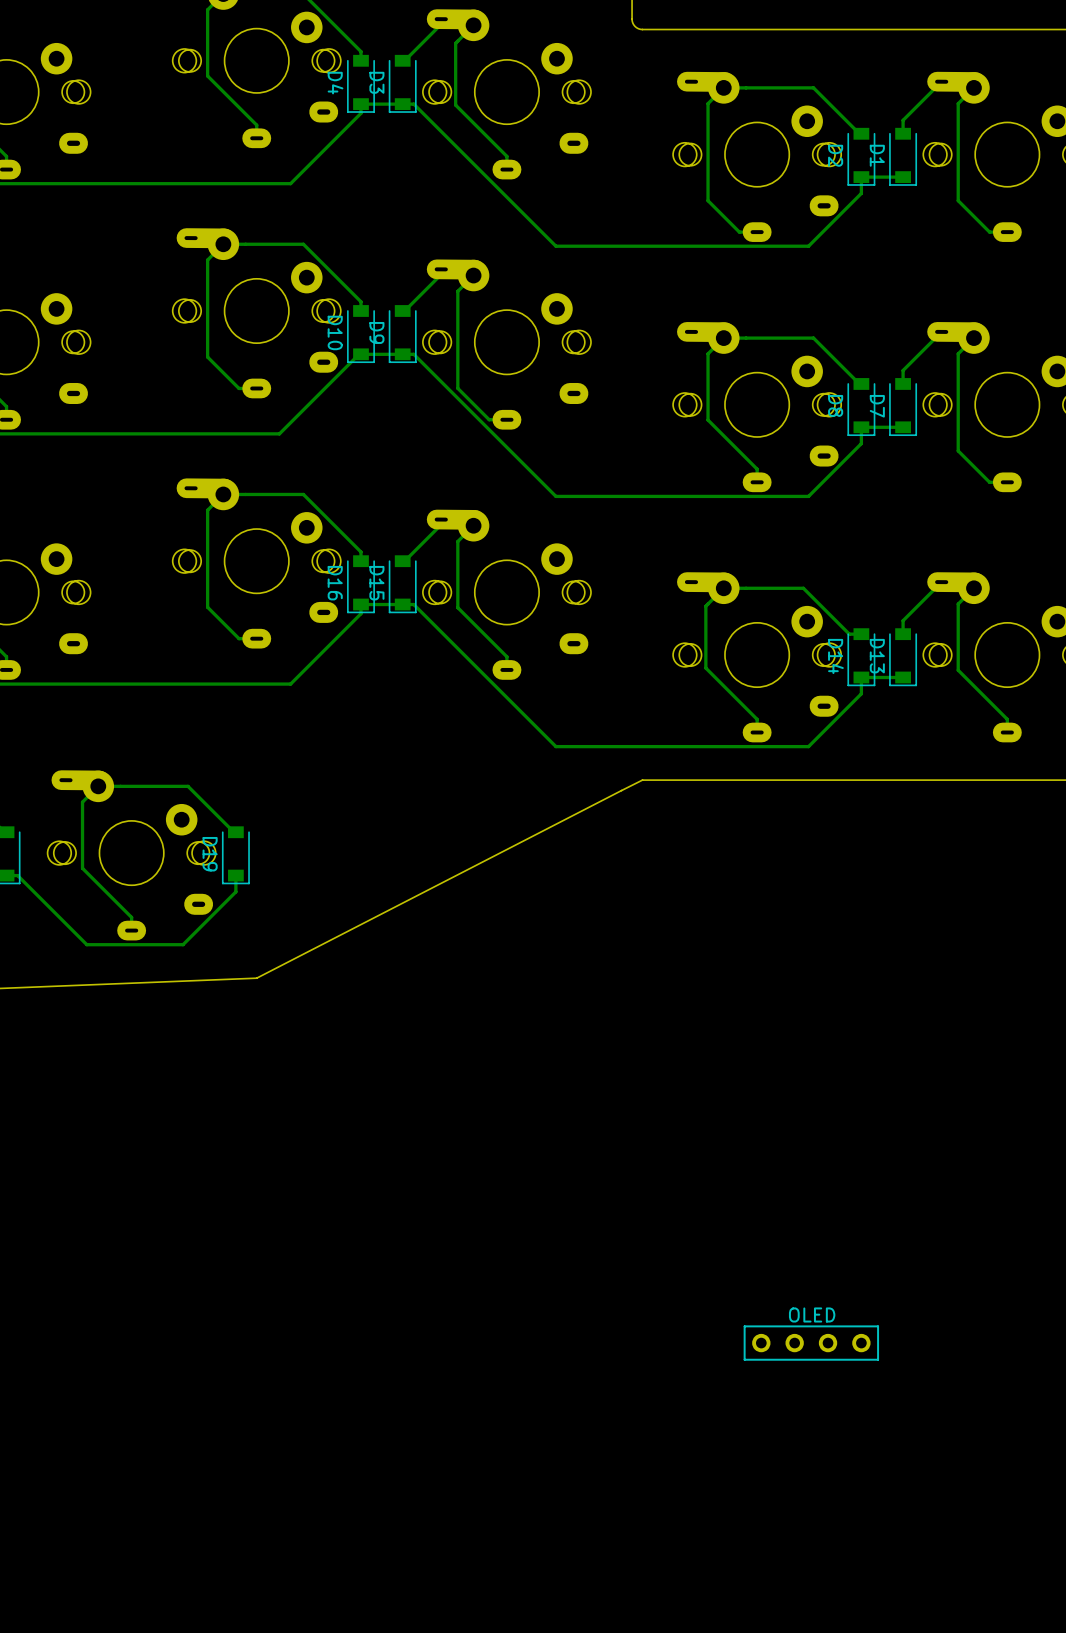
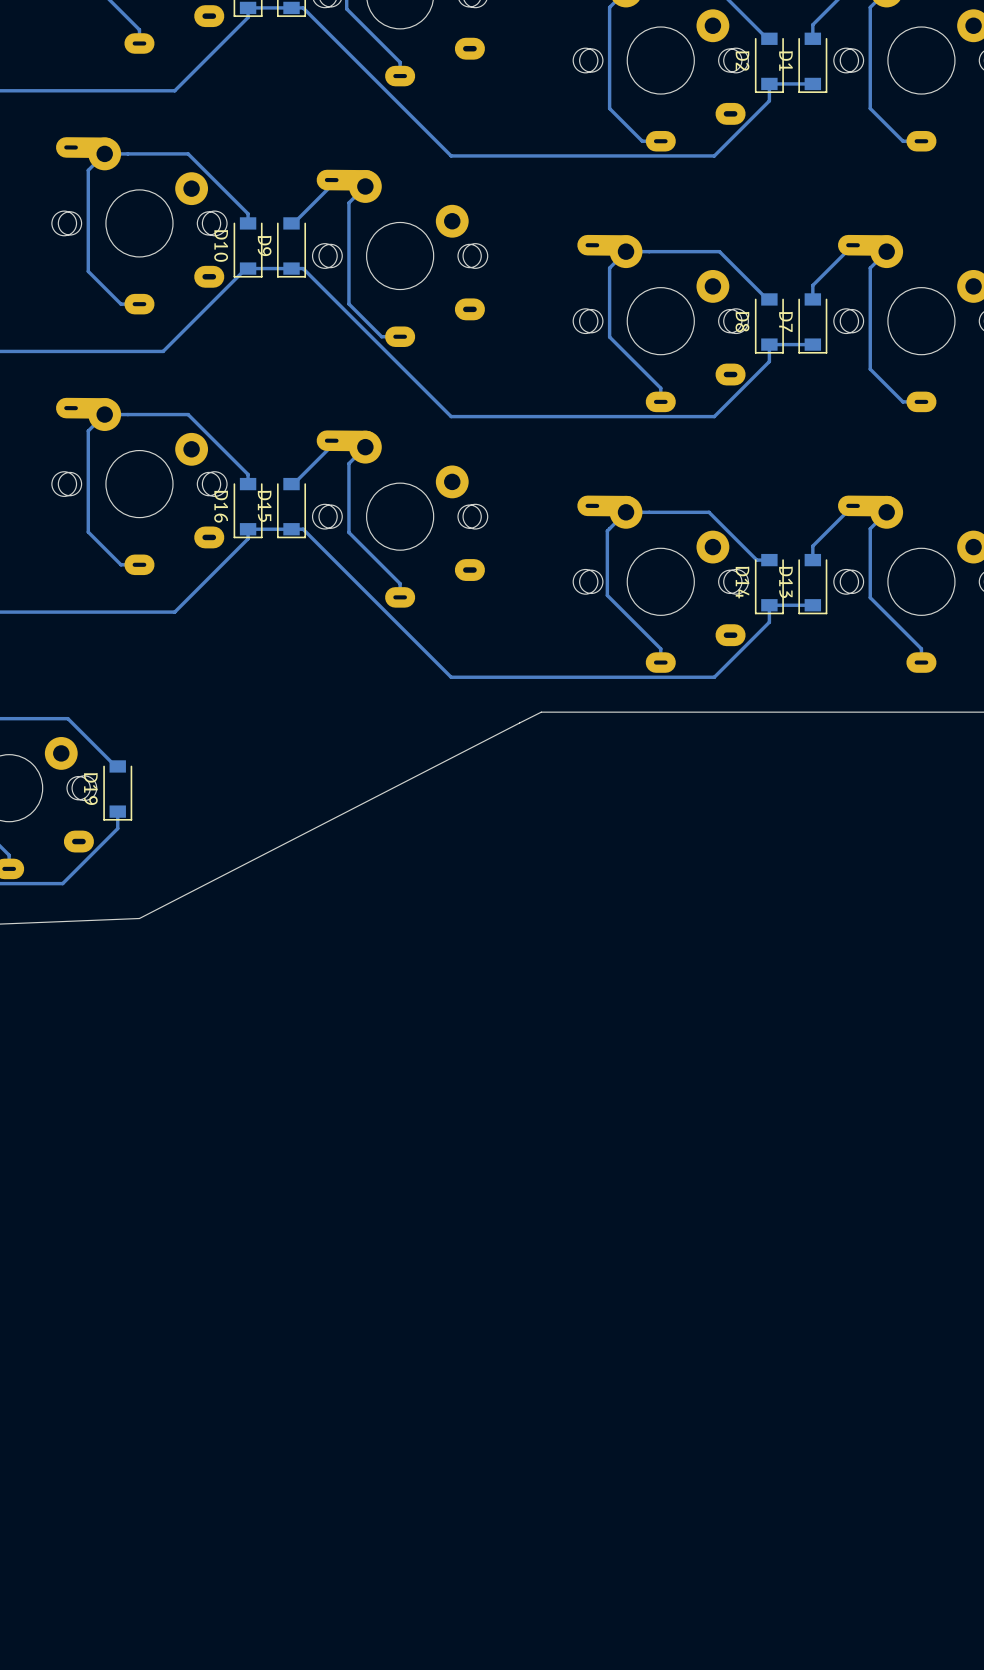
part: (811, 1343) -> none

